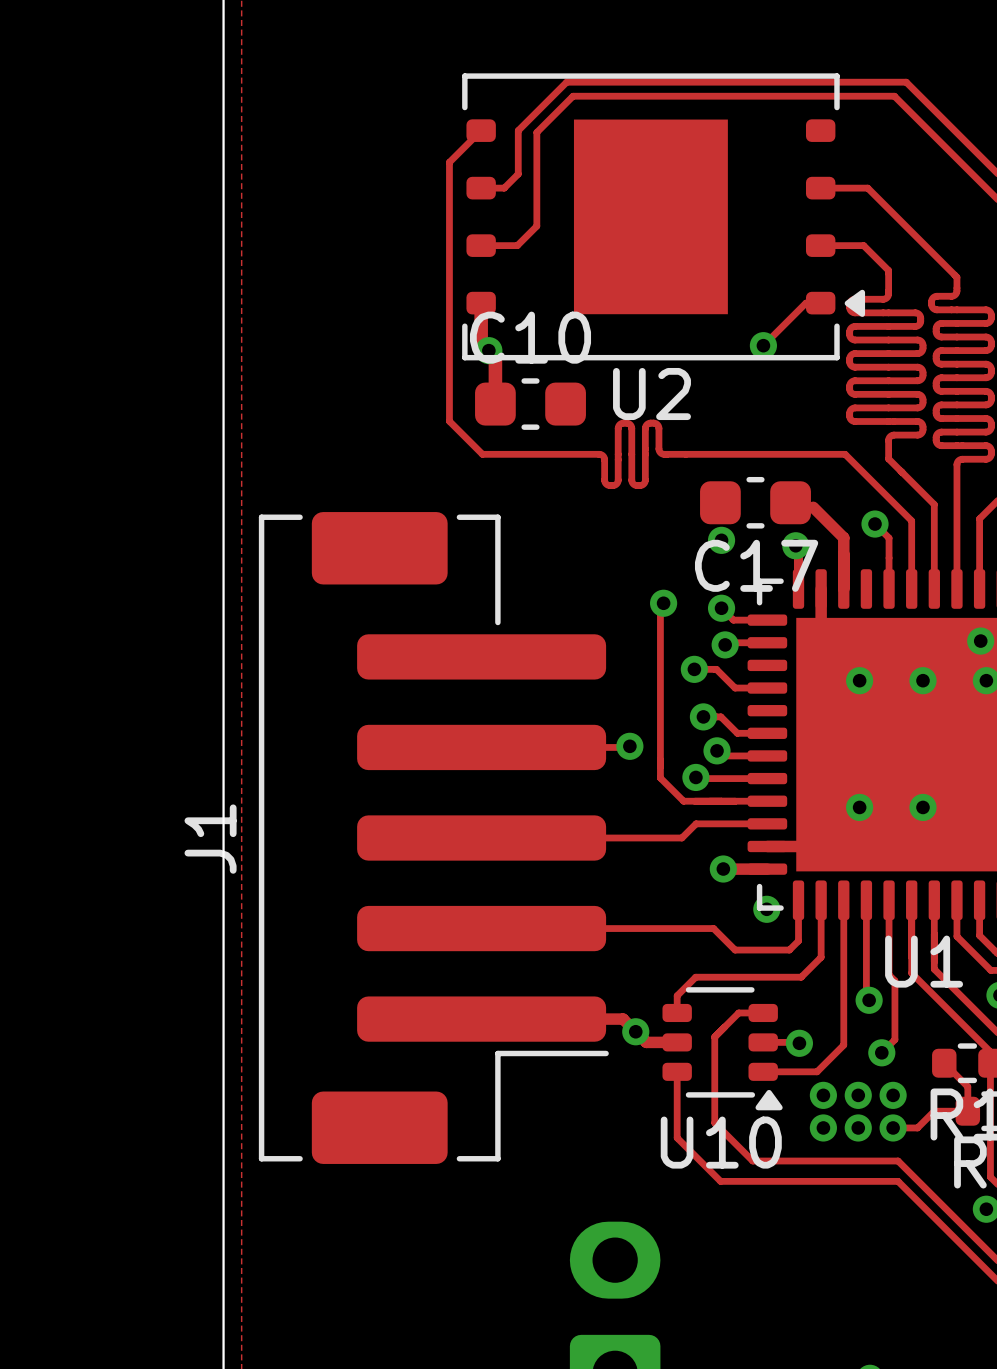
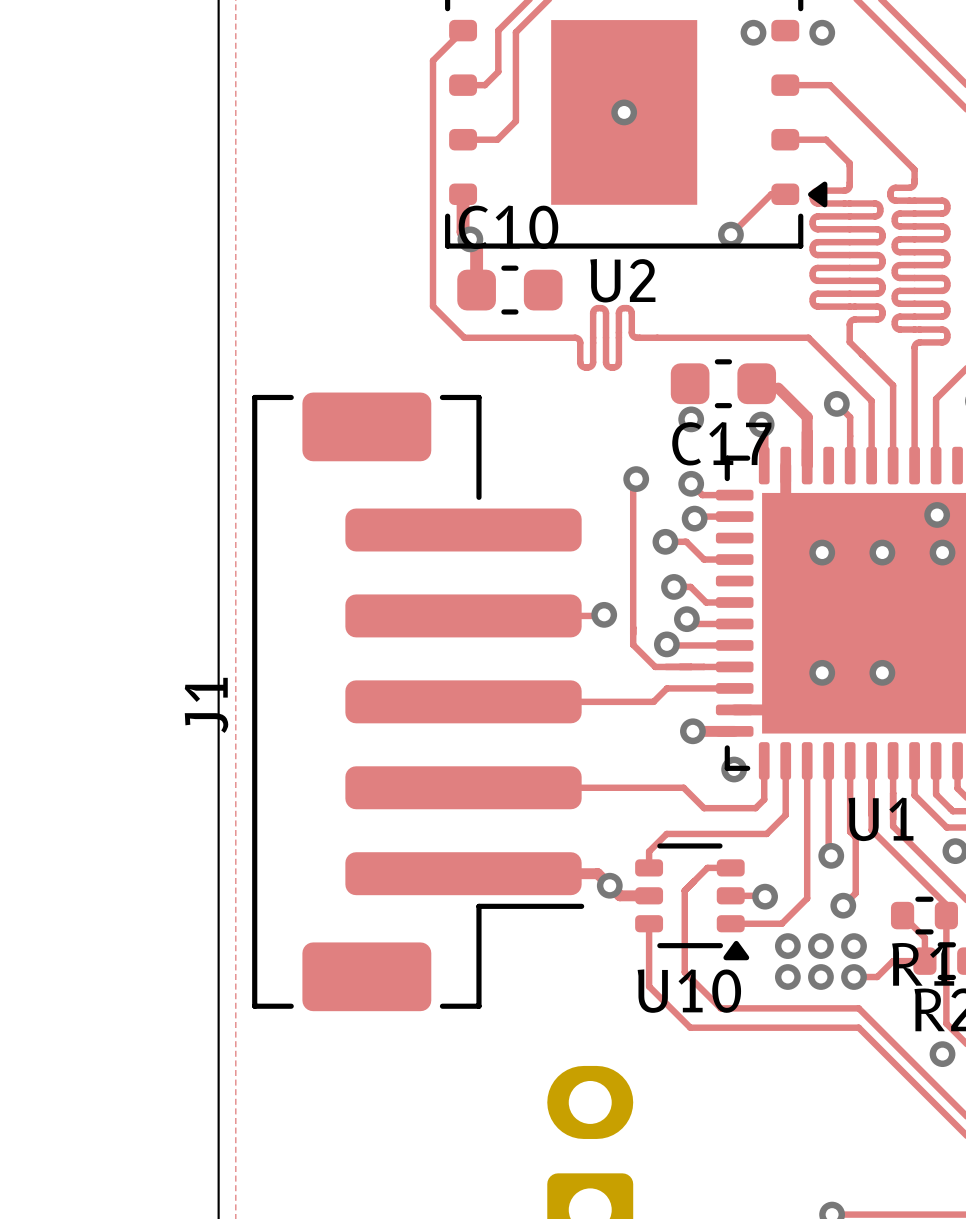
via: none -> (753, 32)
via: none -> (822, 32)
via: none -> (624, 112)

